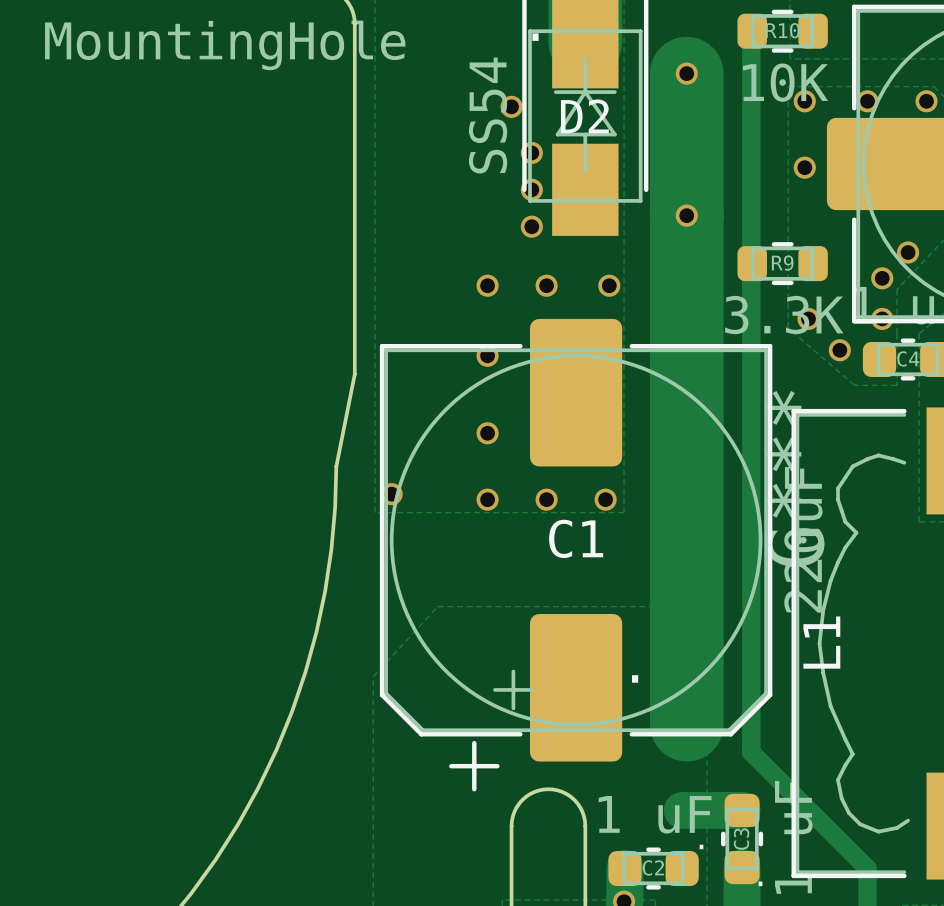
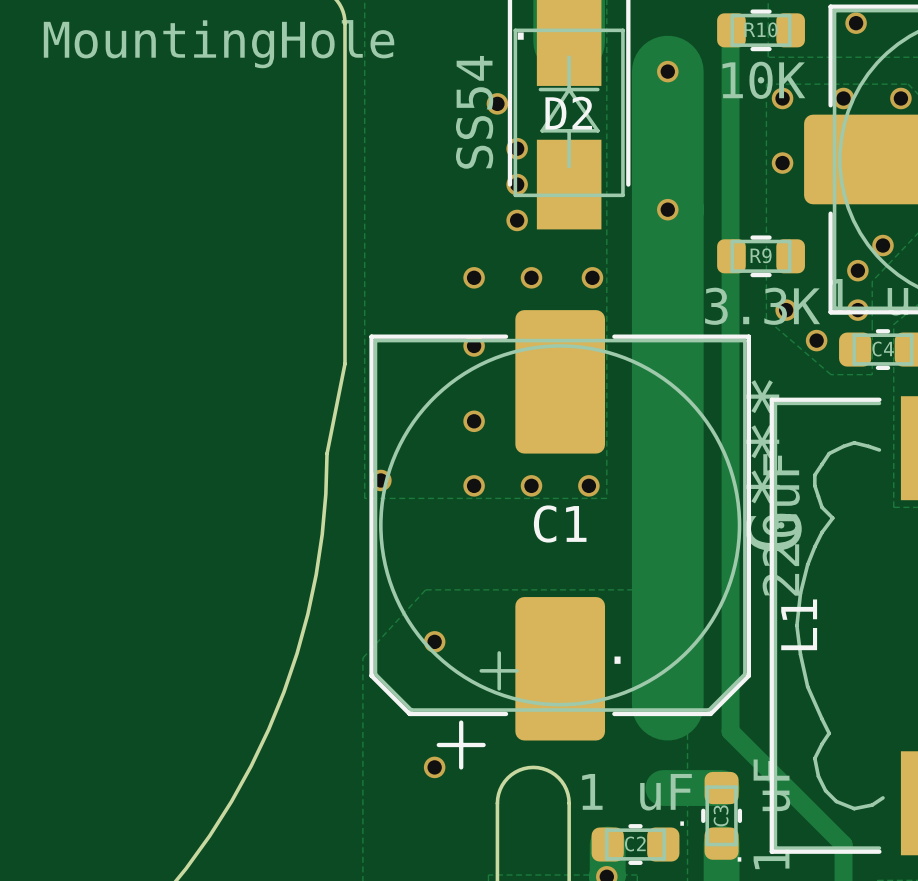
via: none -> (856, 23)
via: none -> (434, 641)
via: none -> (434, 767)

